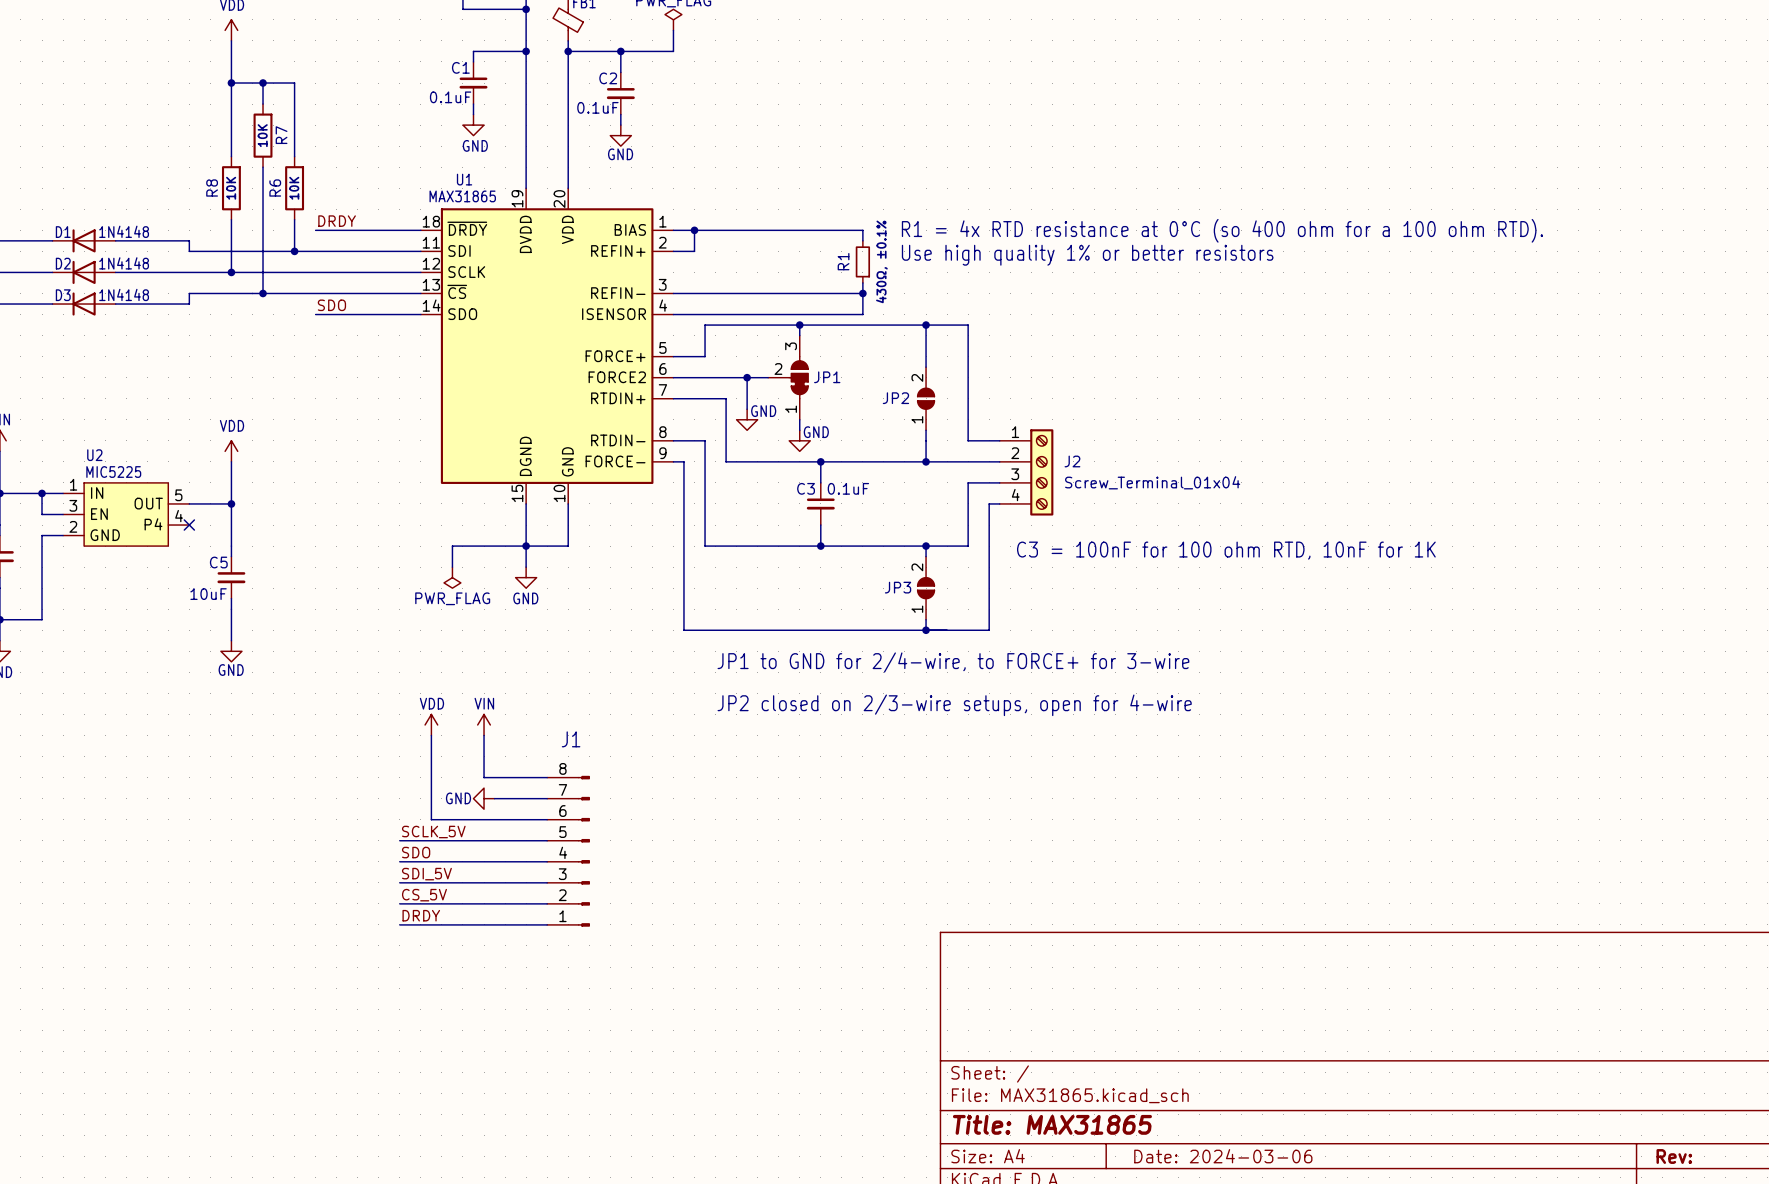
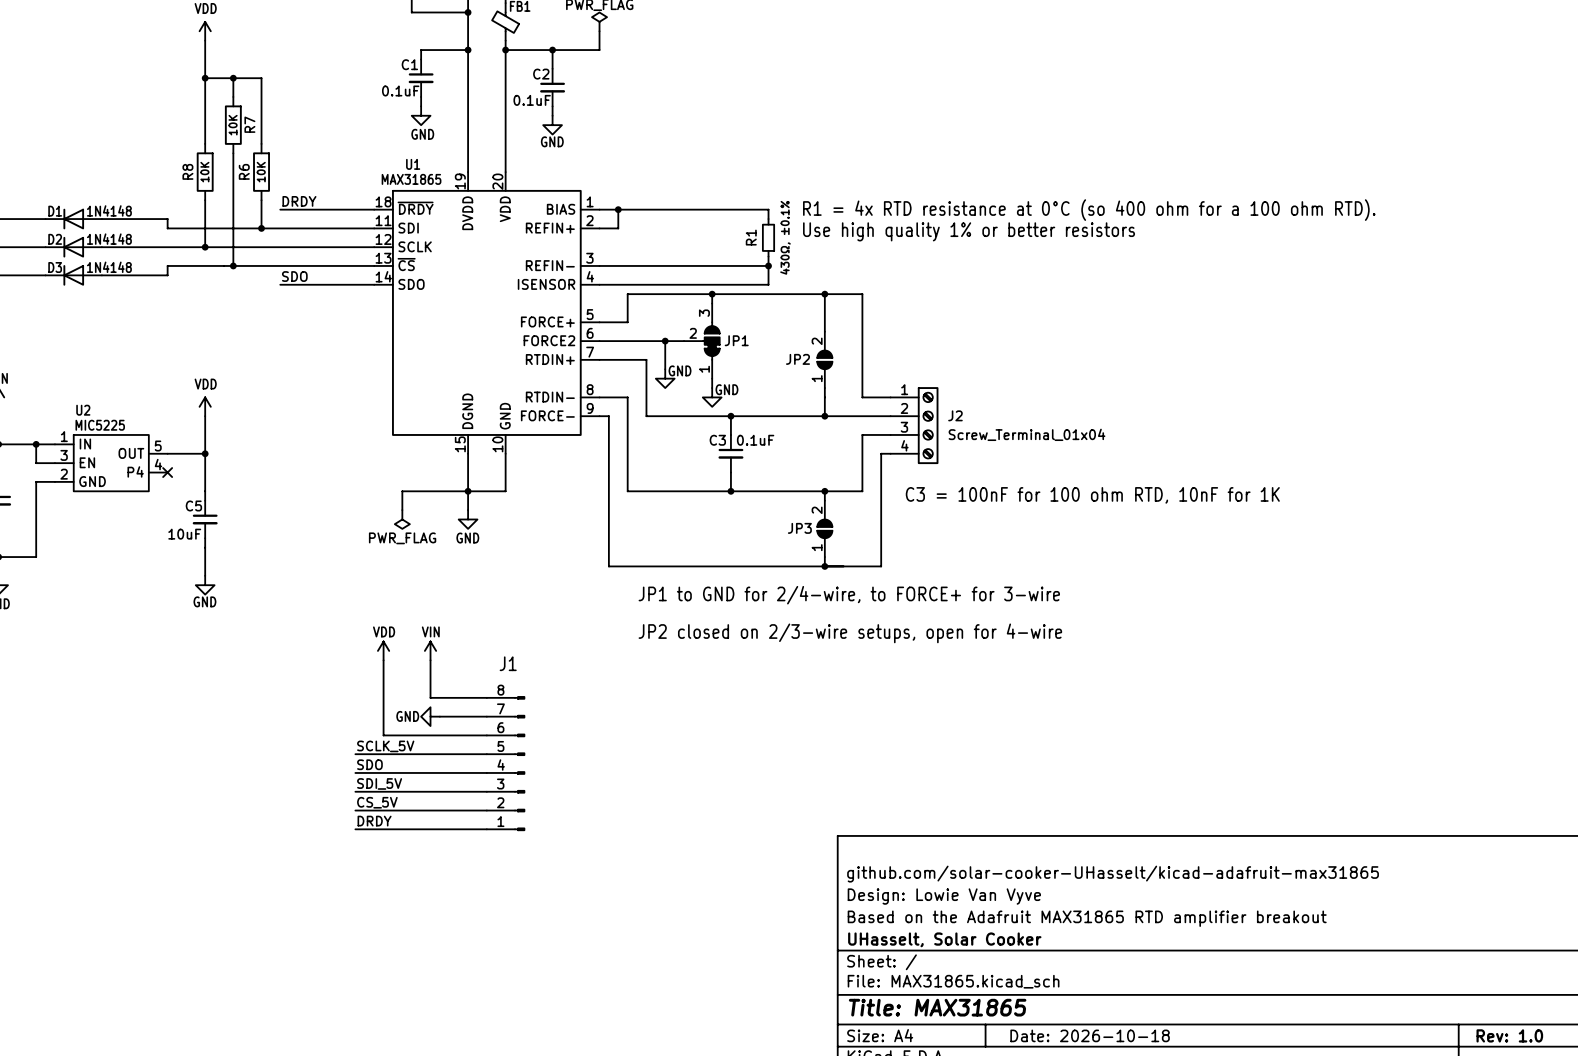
title block: none -> github.com/solar-cooker-UHasselt/kicad-adafruit-max31865 (1113, 874)
title block: none -> Design: Lowie Van Vyve (944, 896)
title block: none -> Based on the Adafruit MAX31865 RTD amplifier breakout (1087, 918)
title block: none -> UHasselt, Solar Cooker (944, 939)
title block: Date: 2024-03-06 (1223, 1156) -> Date: 2026-10-18 (1090, 1035)
title block: Rev: (1674, 1156) -> Rev: 1.0 (1509, 1035)

